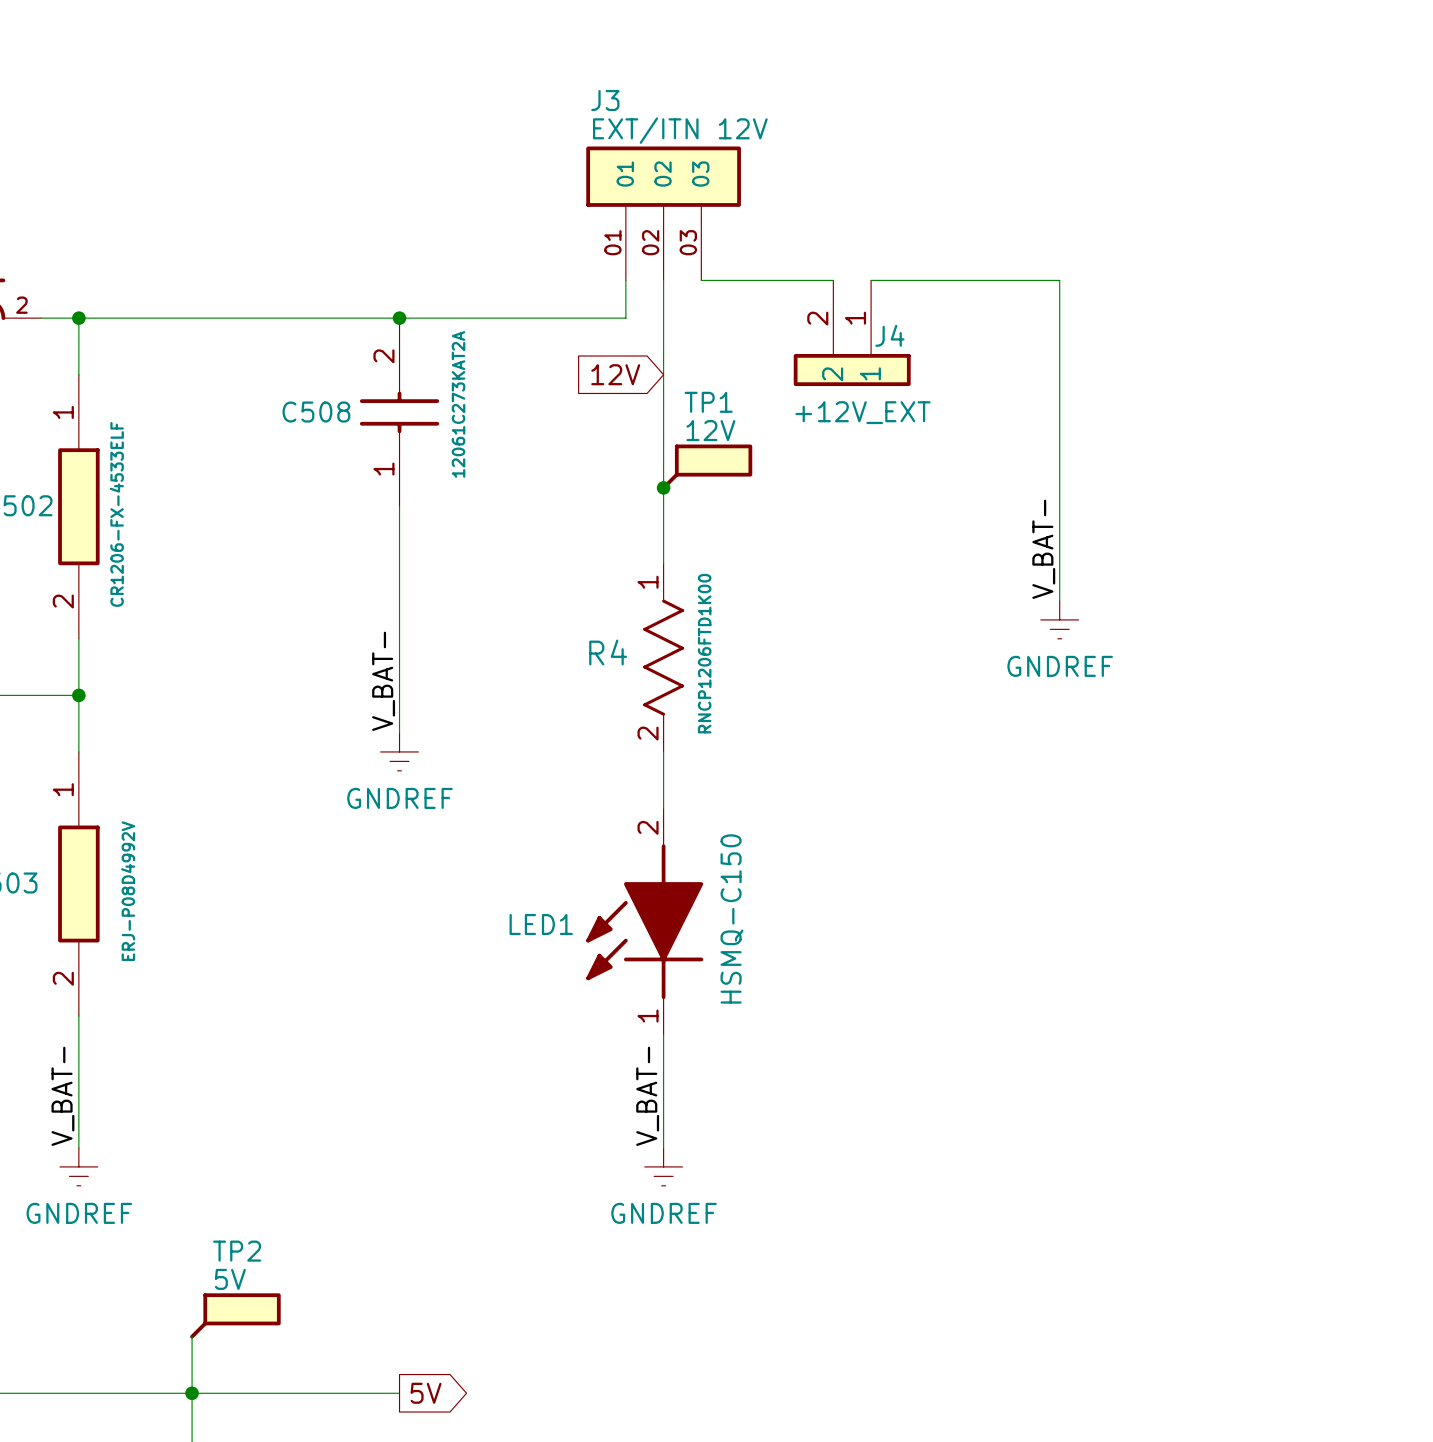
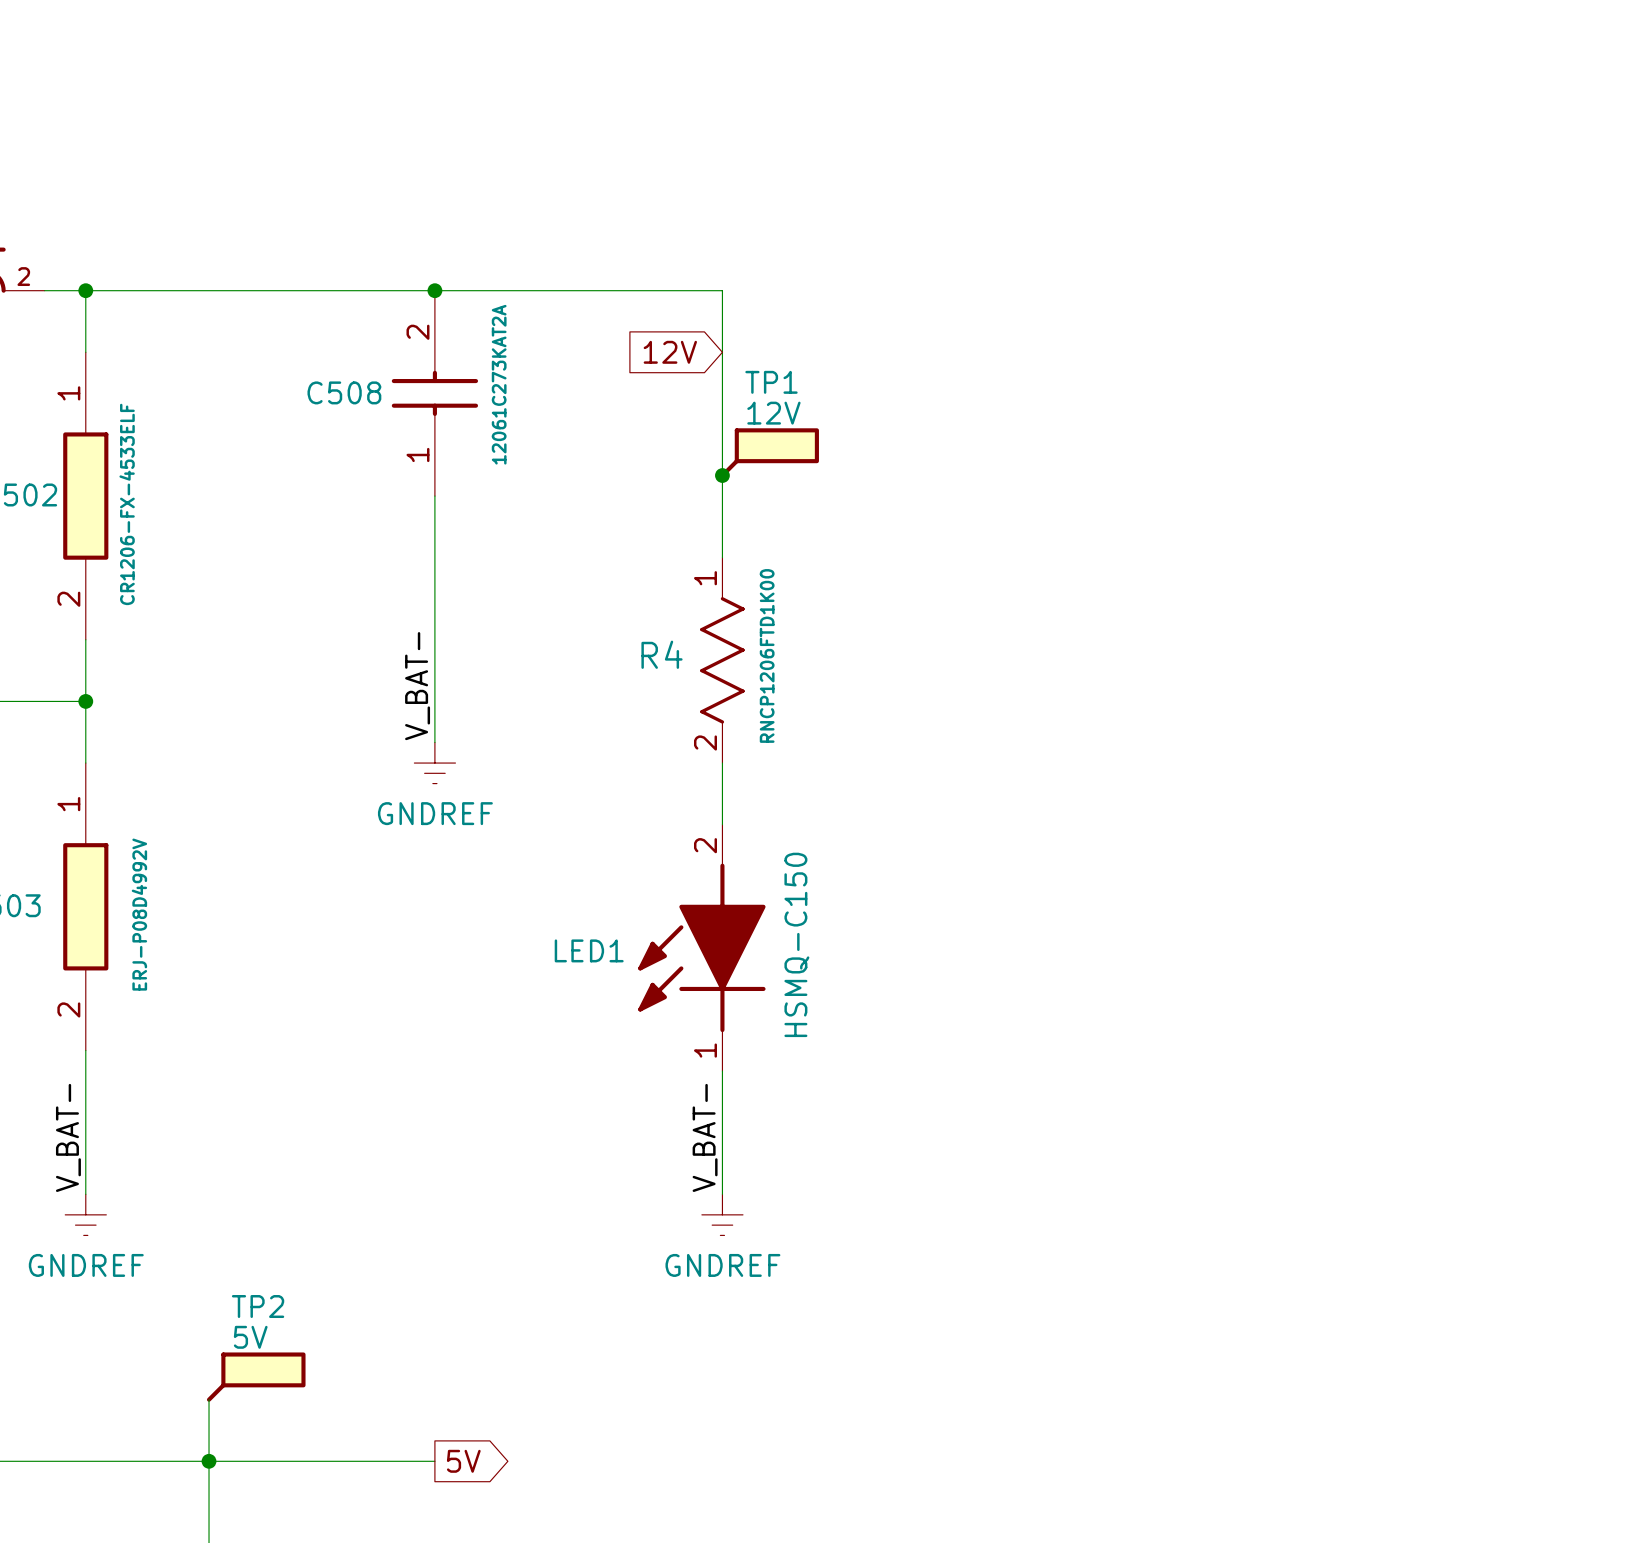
J3: EXT/ITN 12V (663, 213) -> none
wire: (625, 280) (625, 318) -> (722, 290) (681, 290)
wire: (663, 280) (663, 318) -> none
wire: (701, 280) (833, 280) -> none
wire: (871, 280) (1059, 280) (1059, 601) -> none
J4: +12V_EXT (852, 333) -> none
label: V_BAT- (1043, 549) -> none
power symbol: GNDREF (1059, 619) -> none

